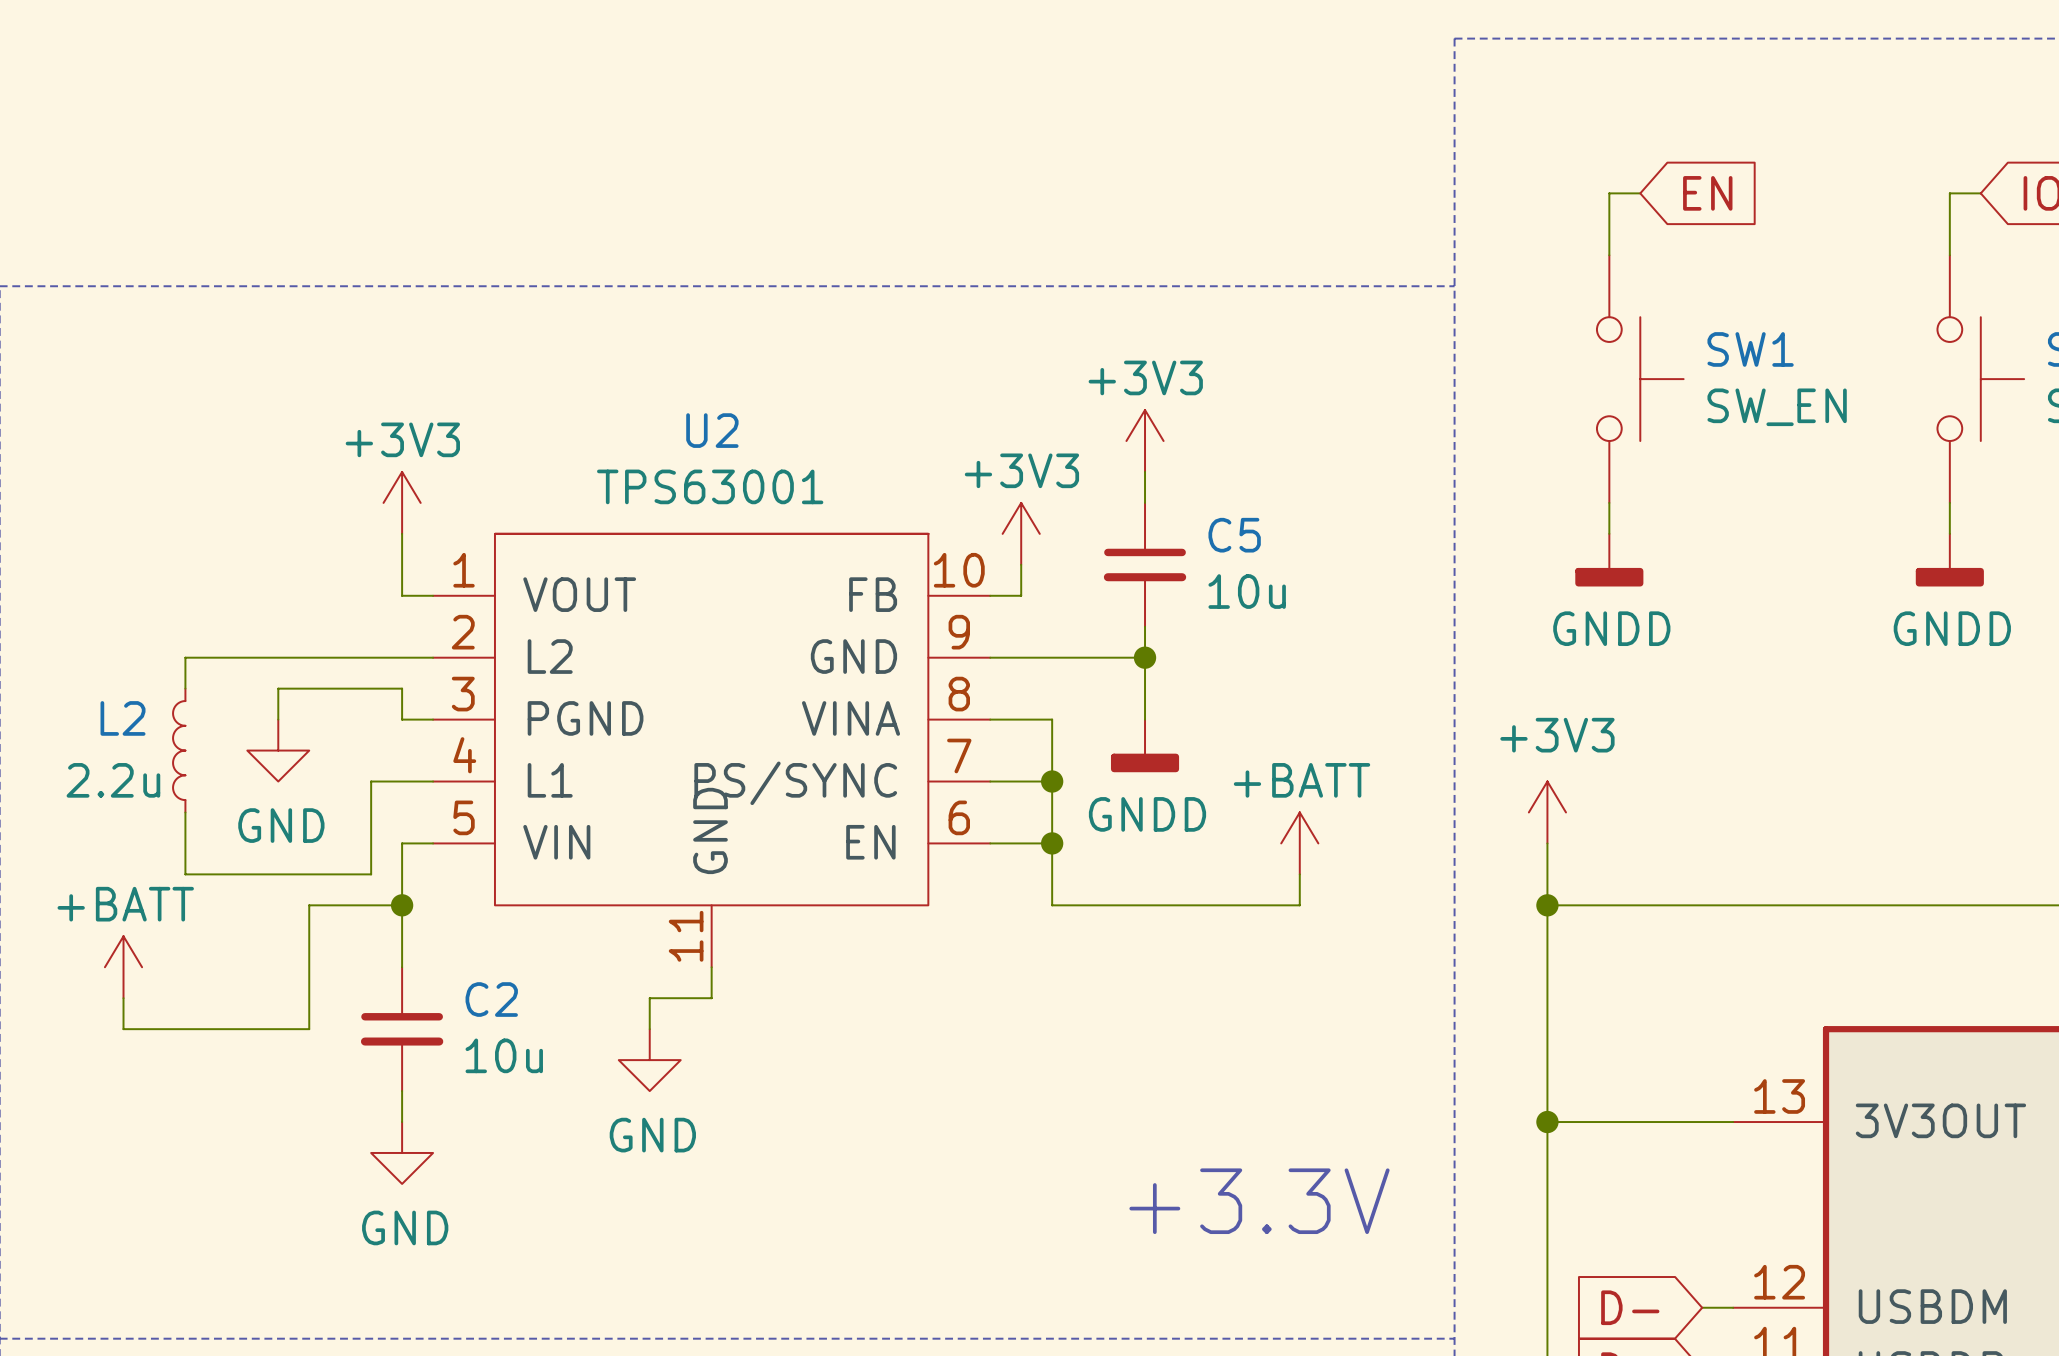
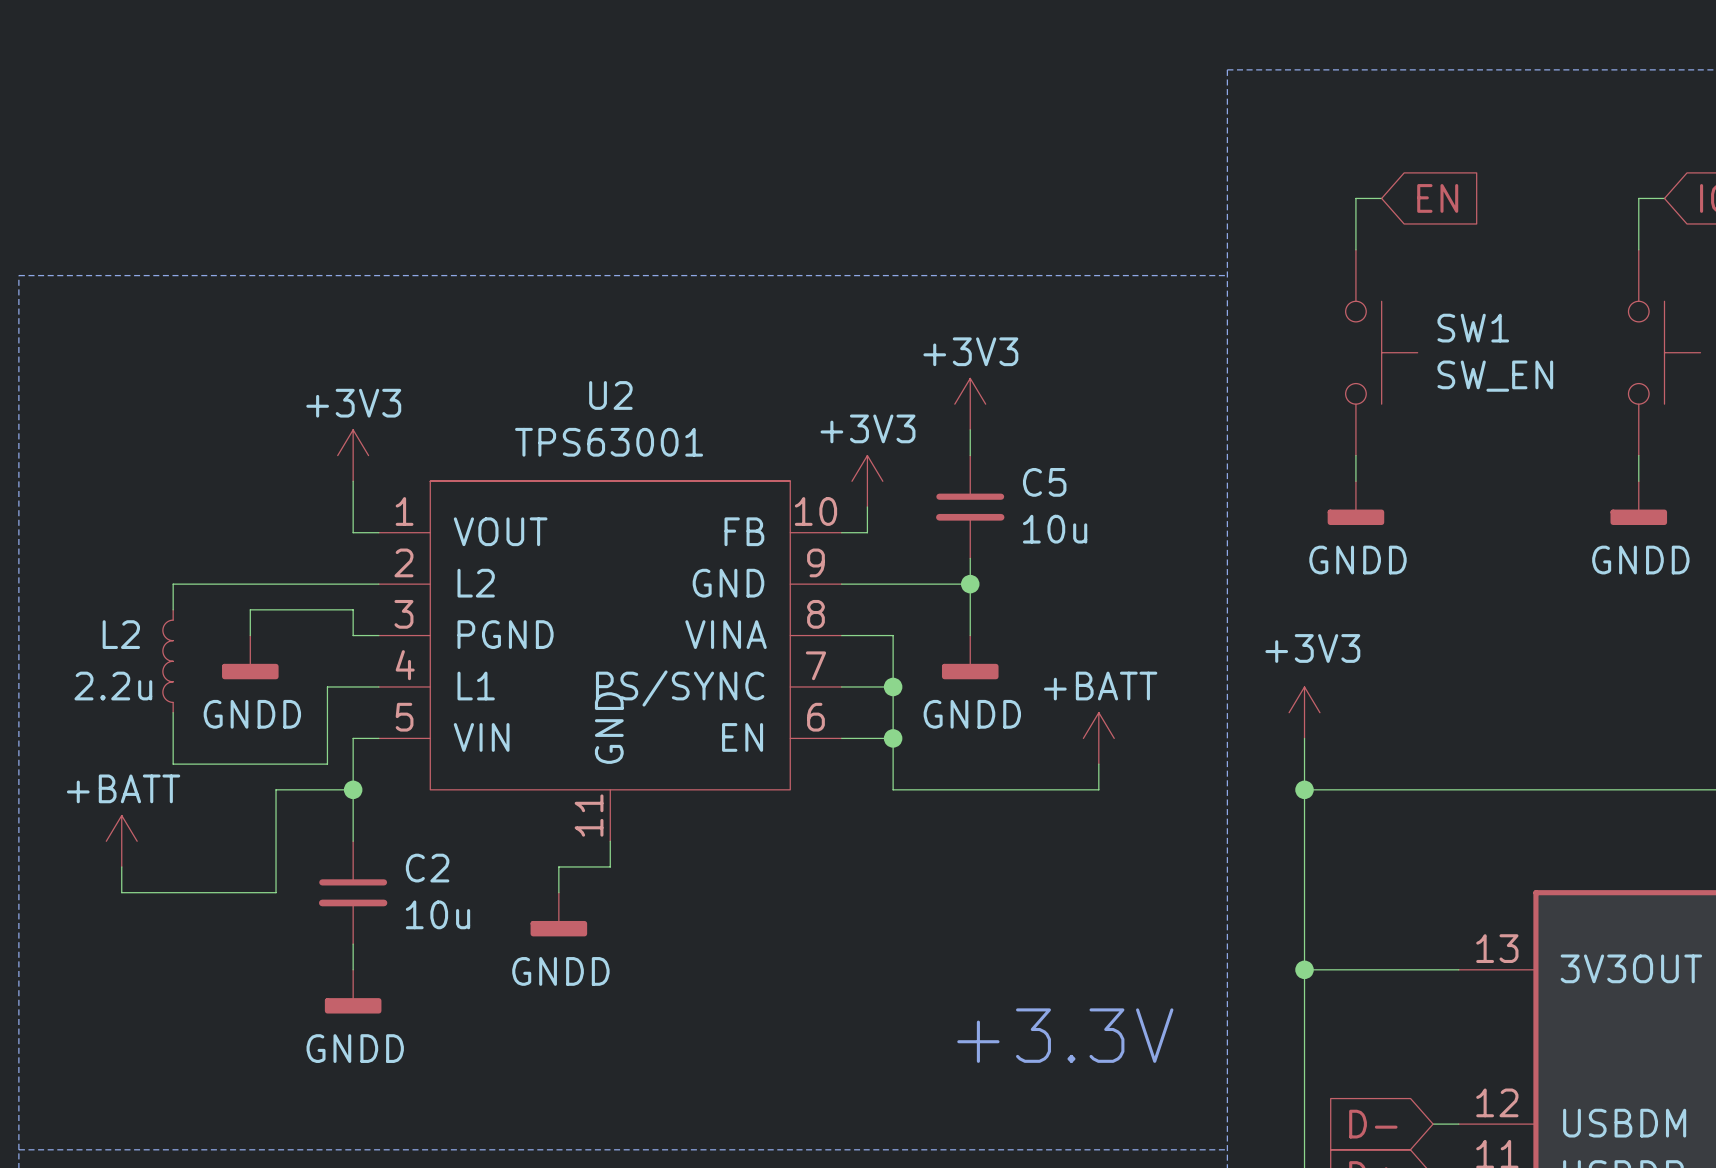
power symbol: GND (278, 750) -> GNDD (250, 657)
power symbol: GND (649, 1060) -> GNDD (558, 914)
power symbol: GND (402, 1152) -> GNDD (353, 991)

